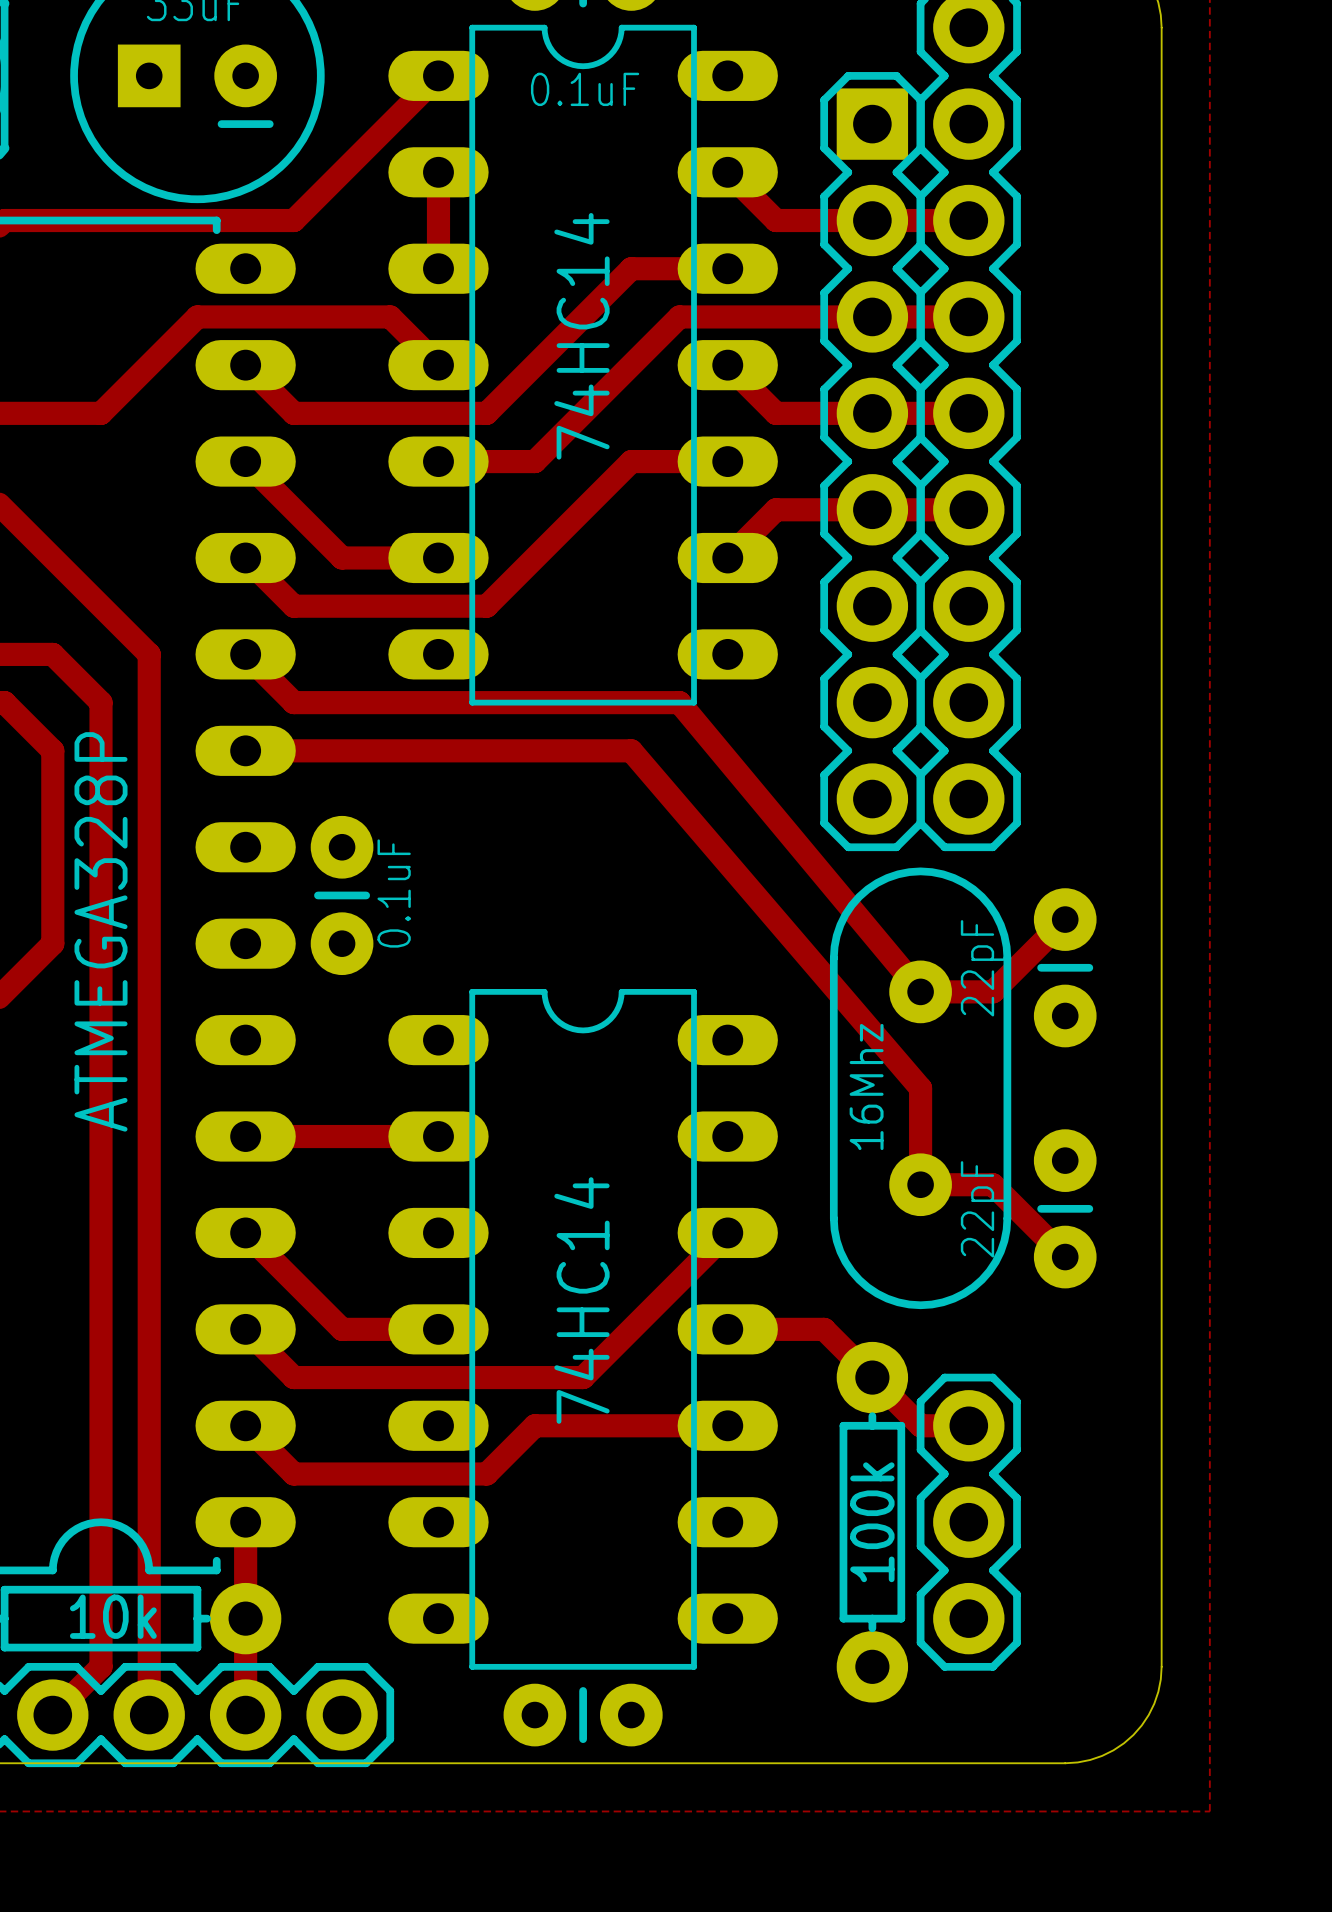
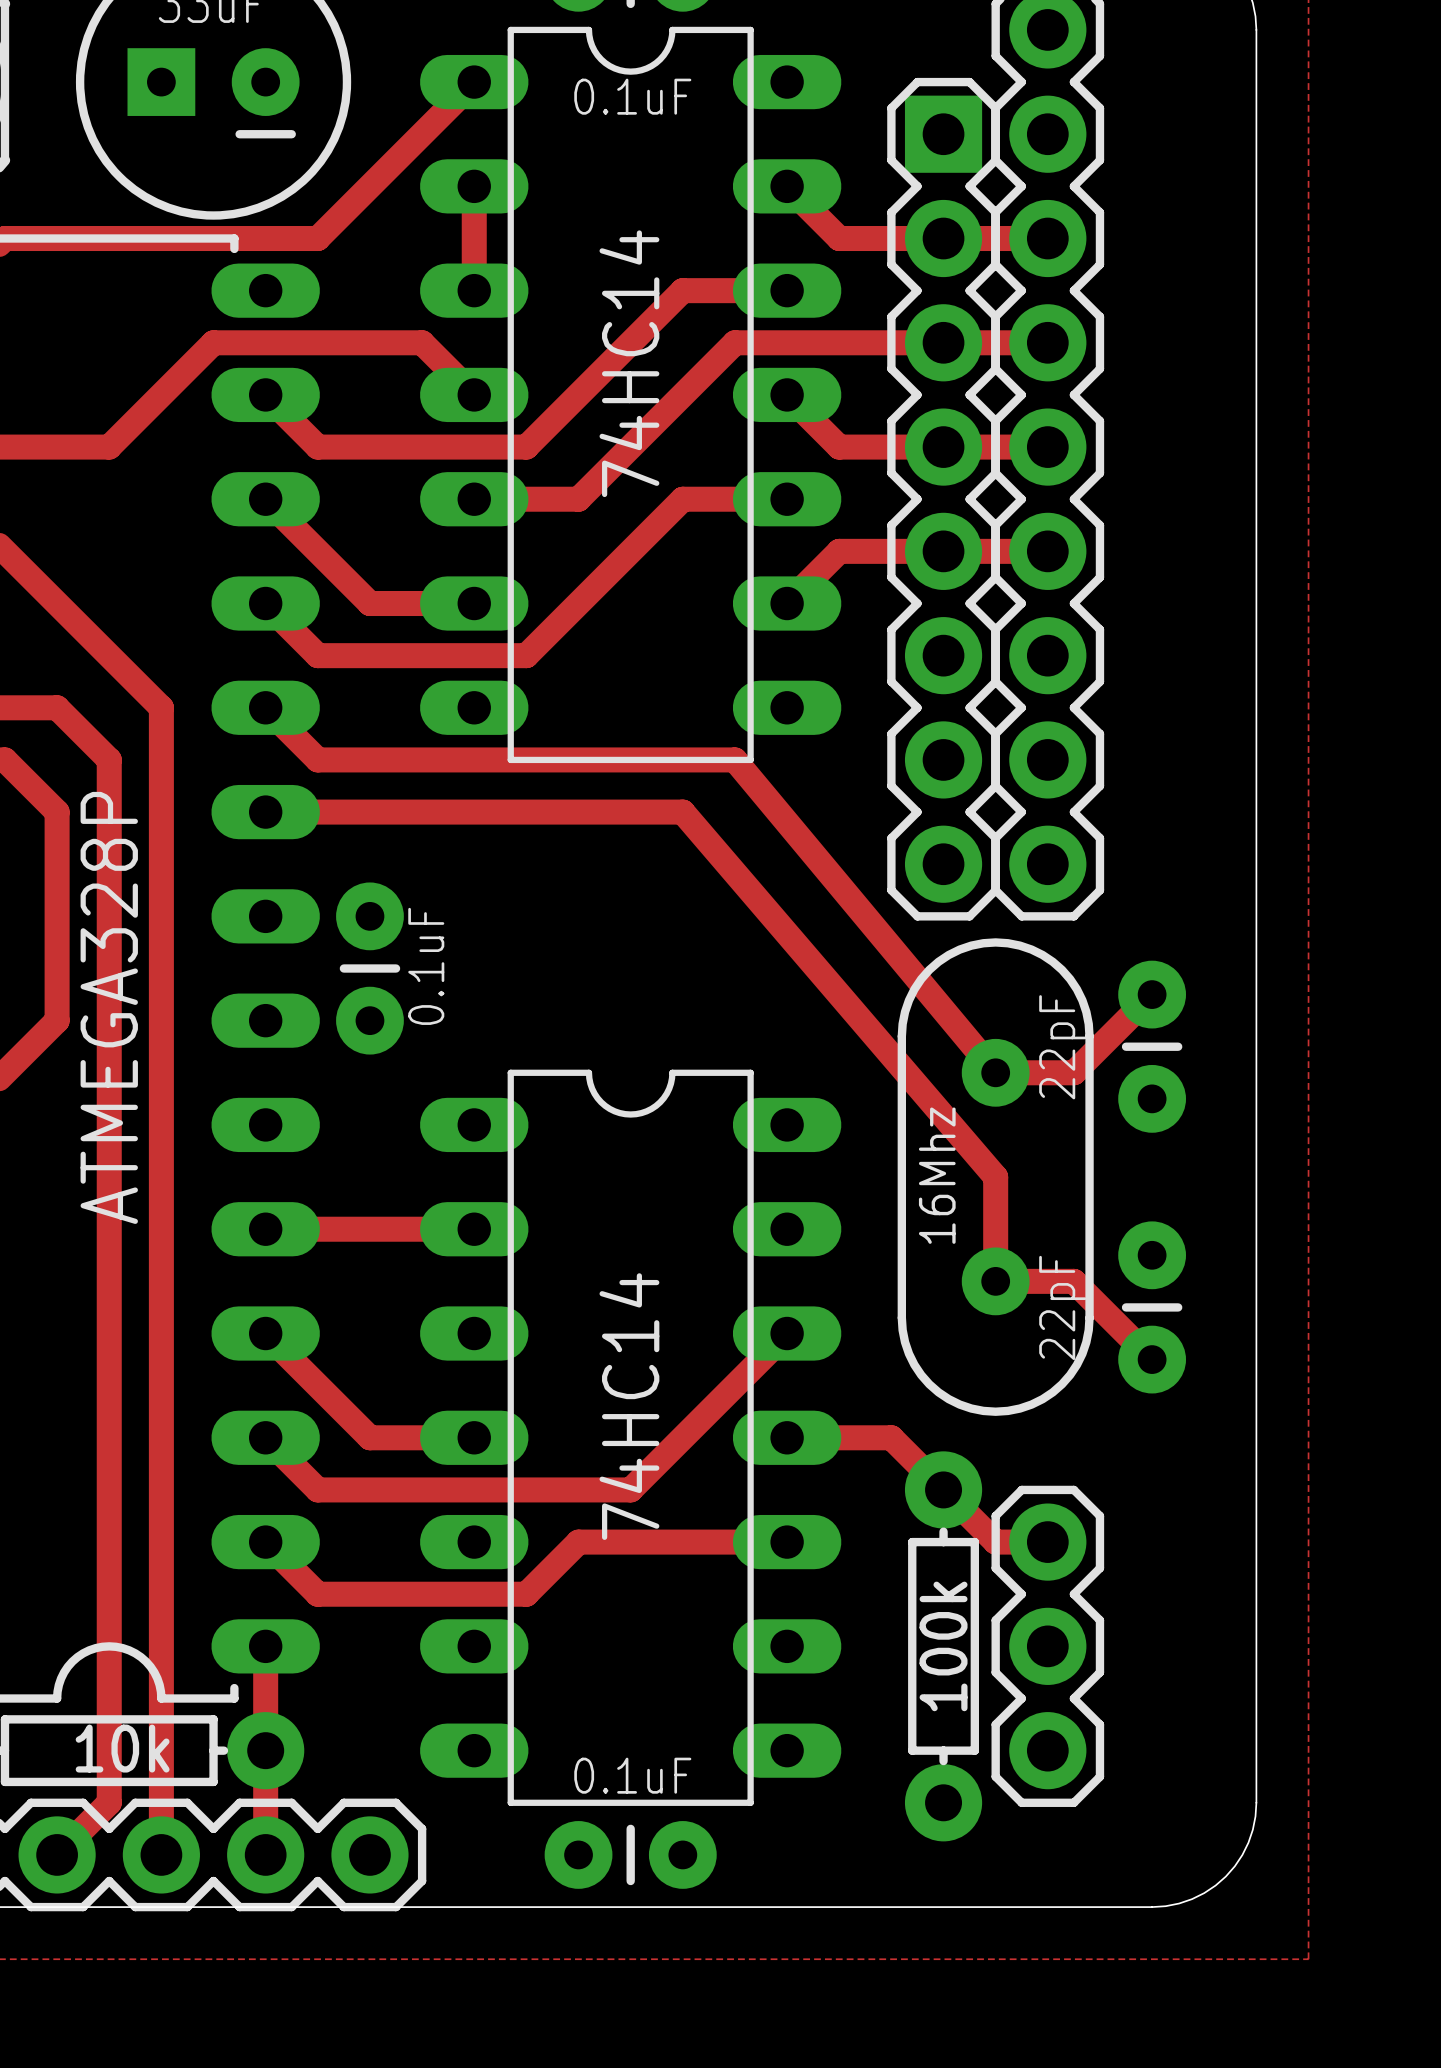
part value: none -> 0.1uF (632, 1775)

